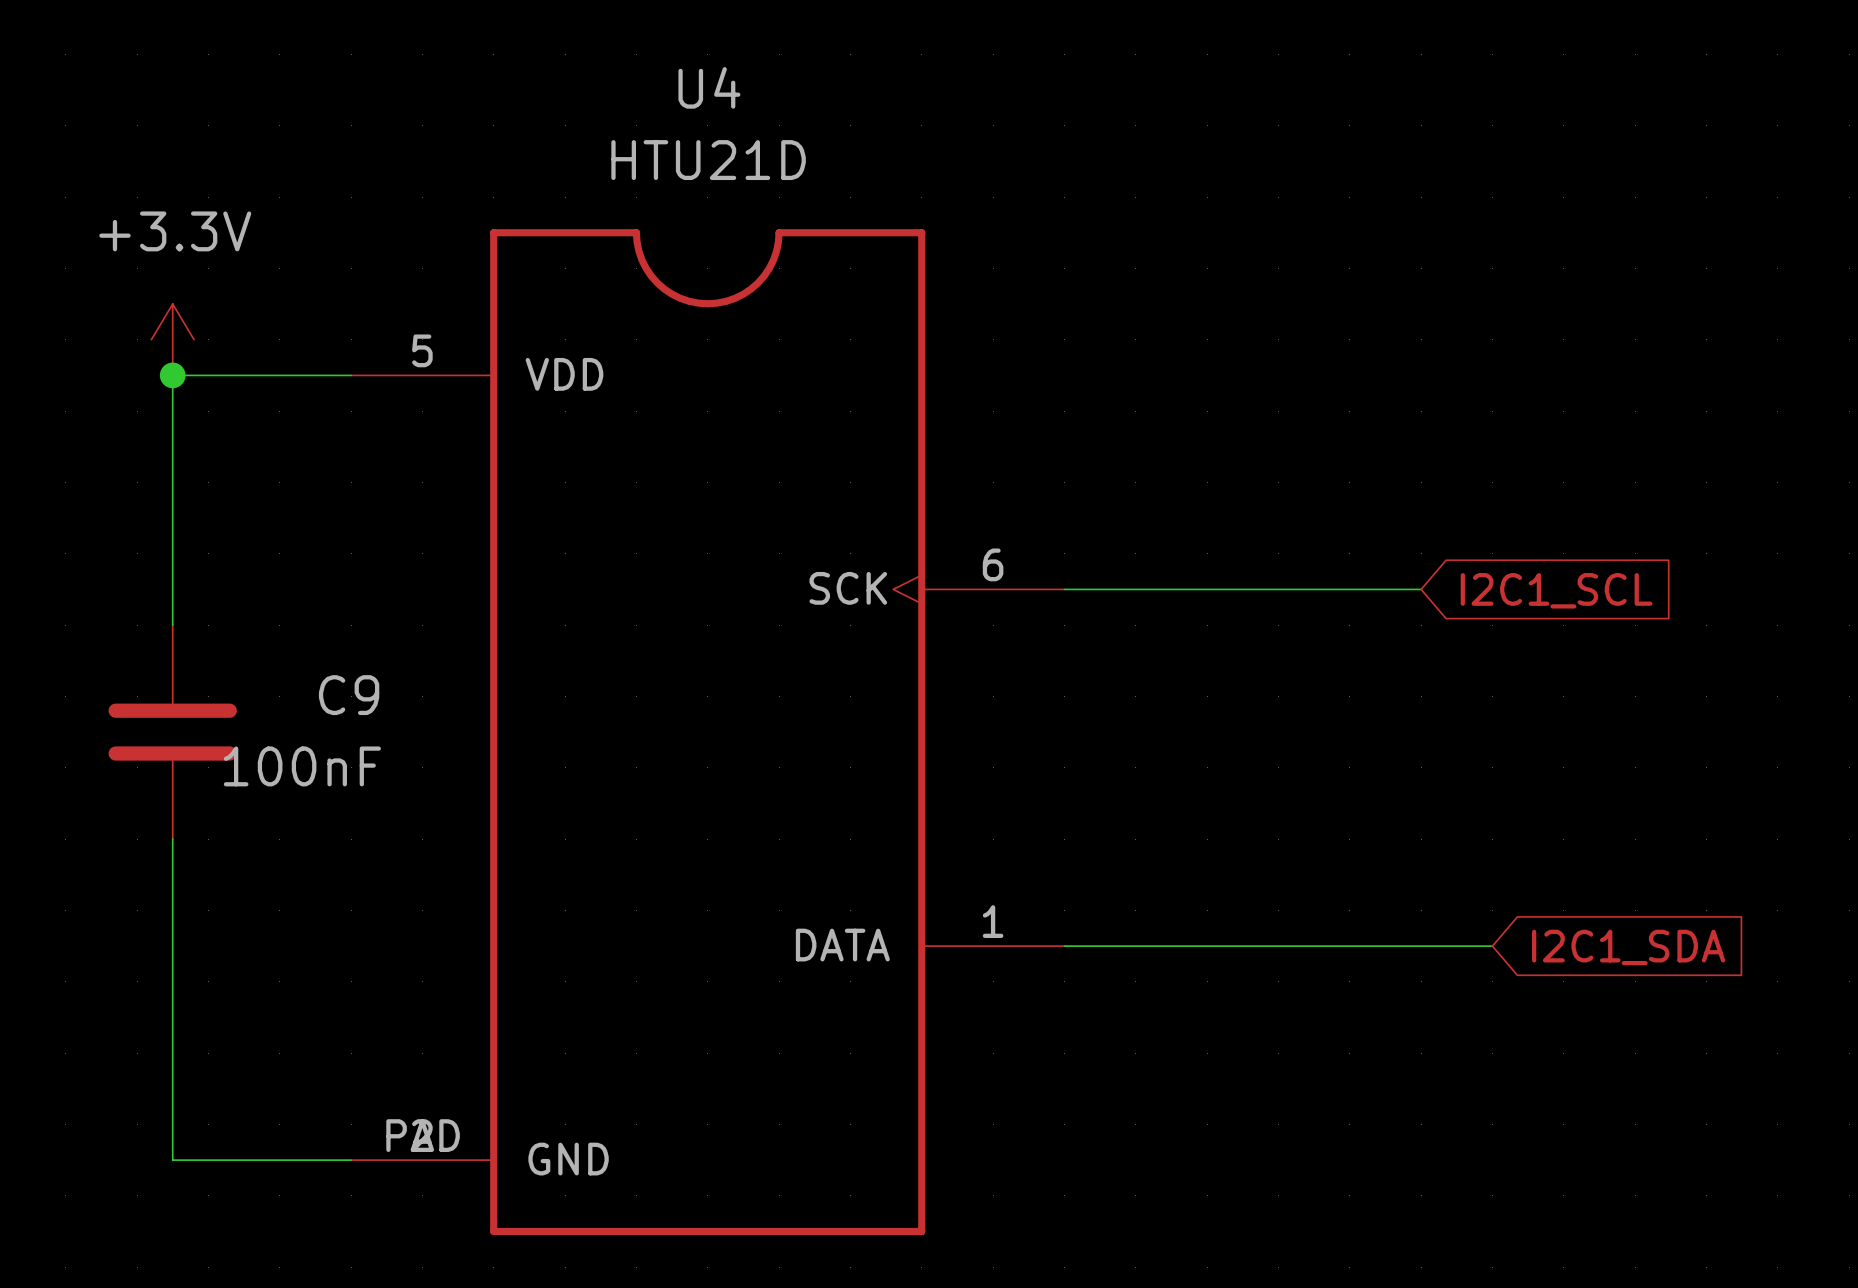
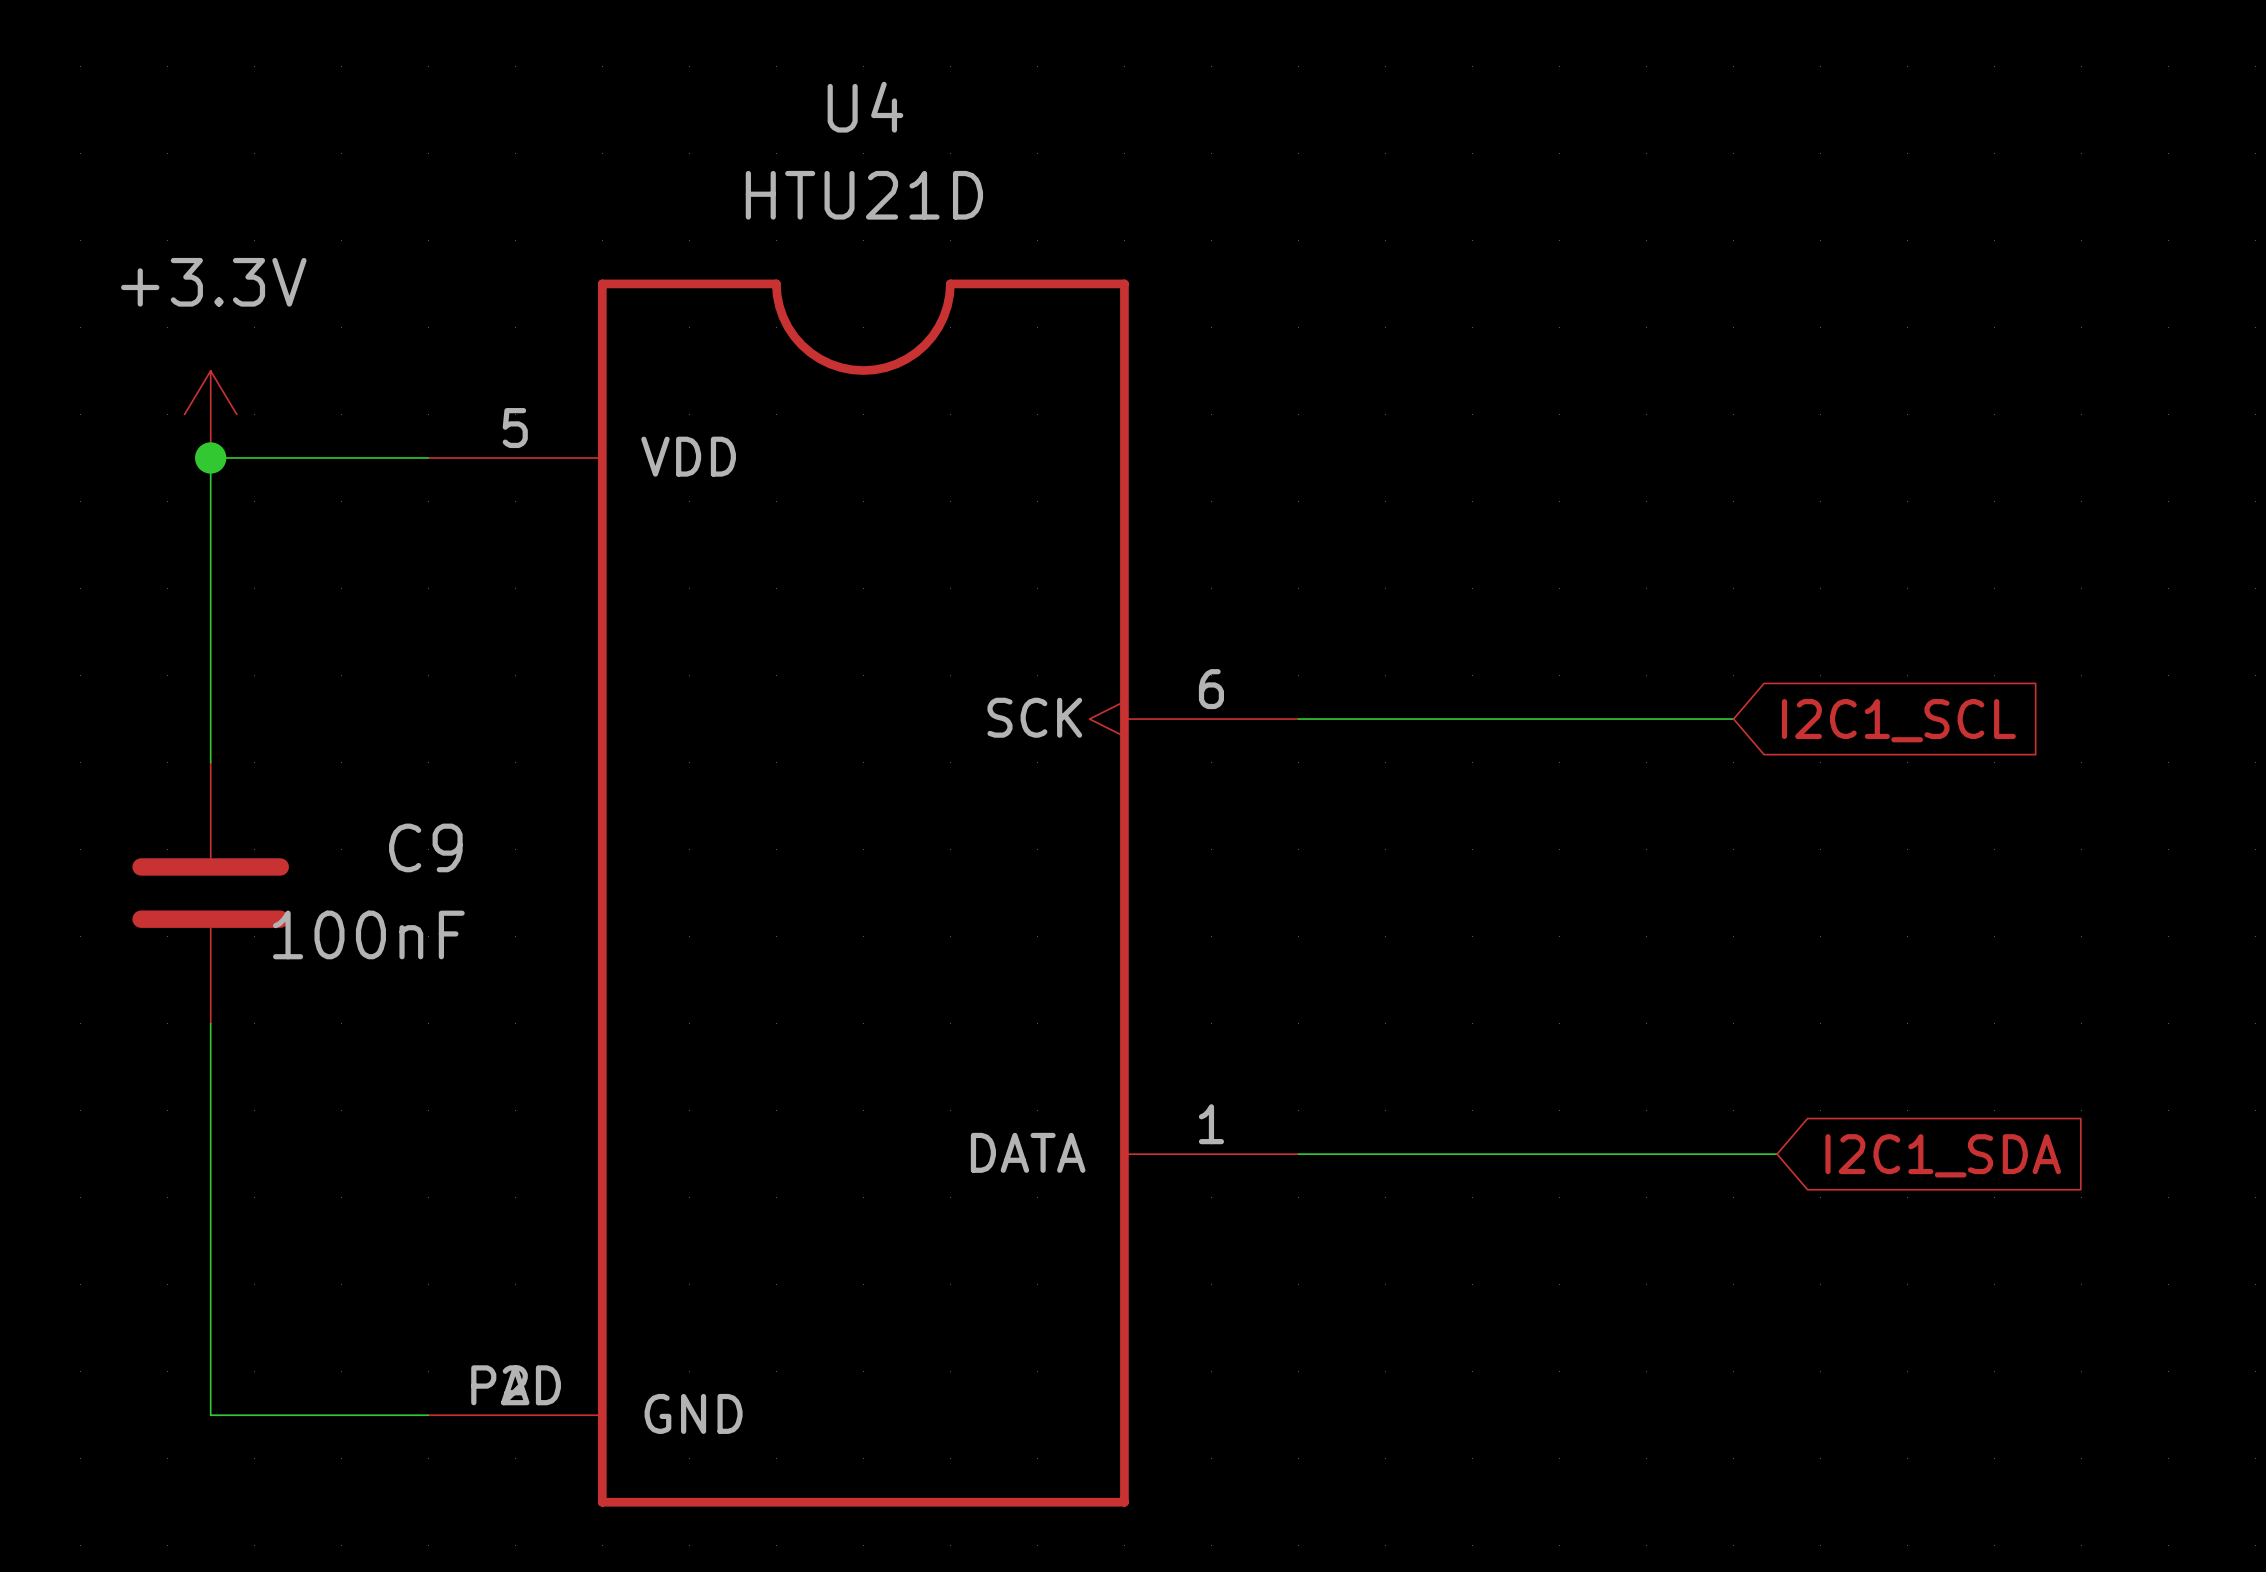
wire: (1456, 946) (1492, 946) -> none
global label position: I2C1_SDA (1628, 947) -> I2C1_SDA (1943, 1155)

